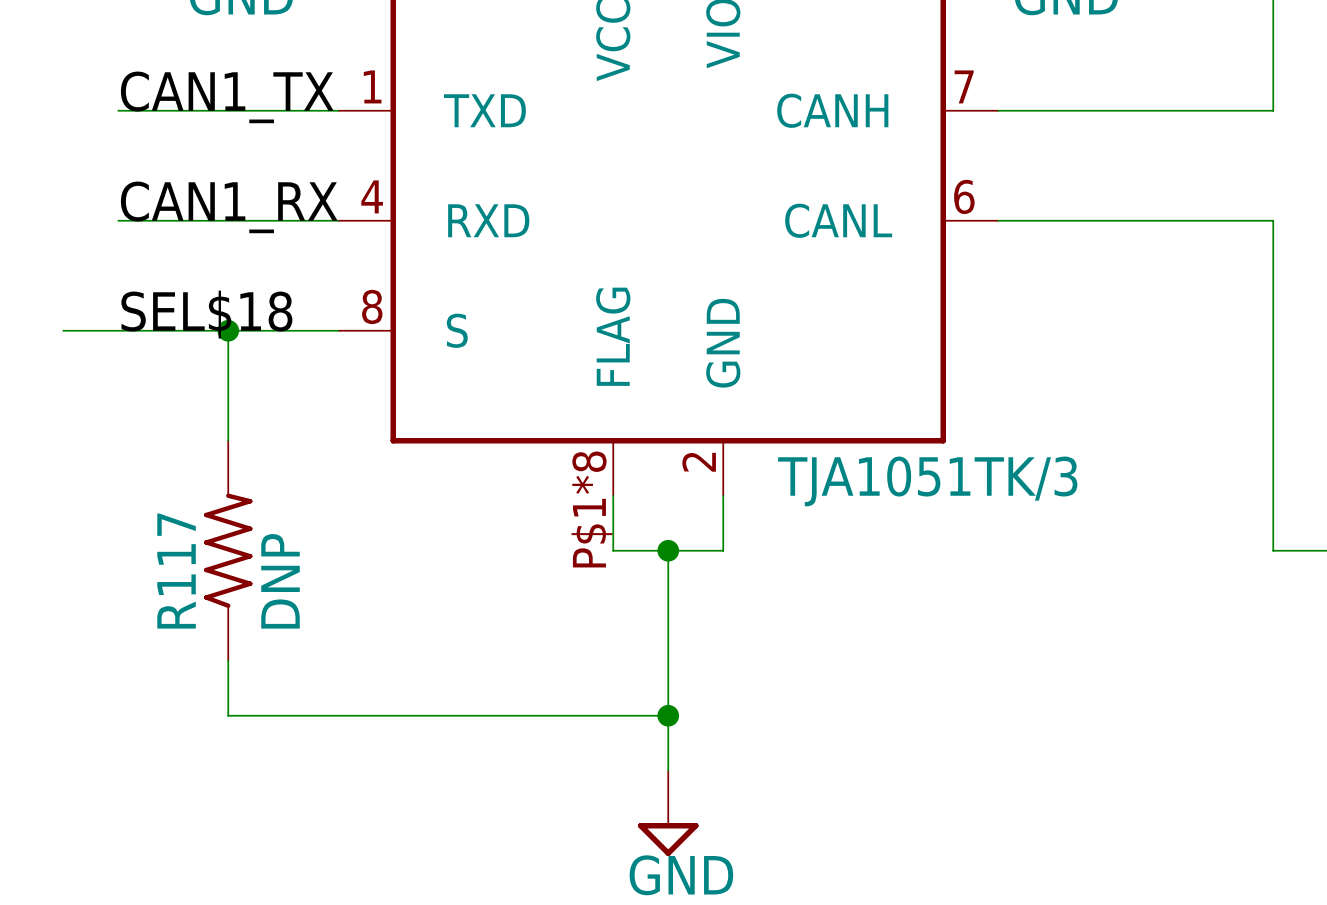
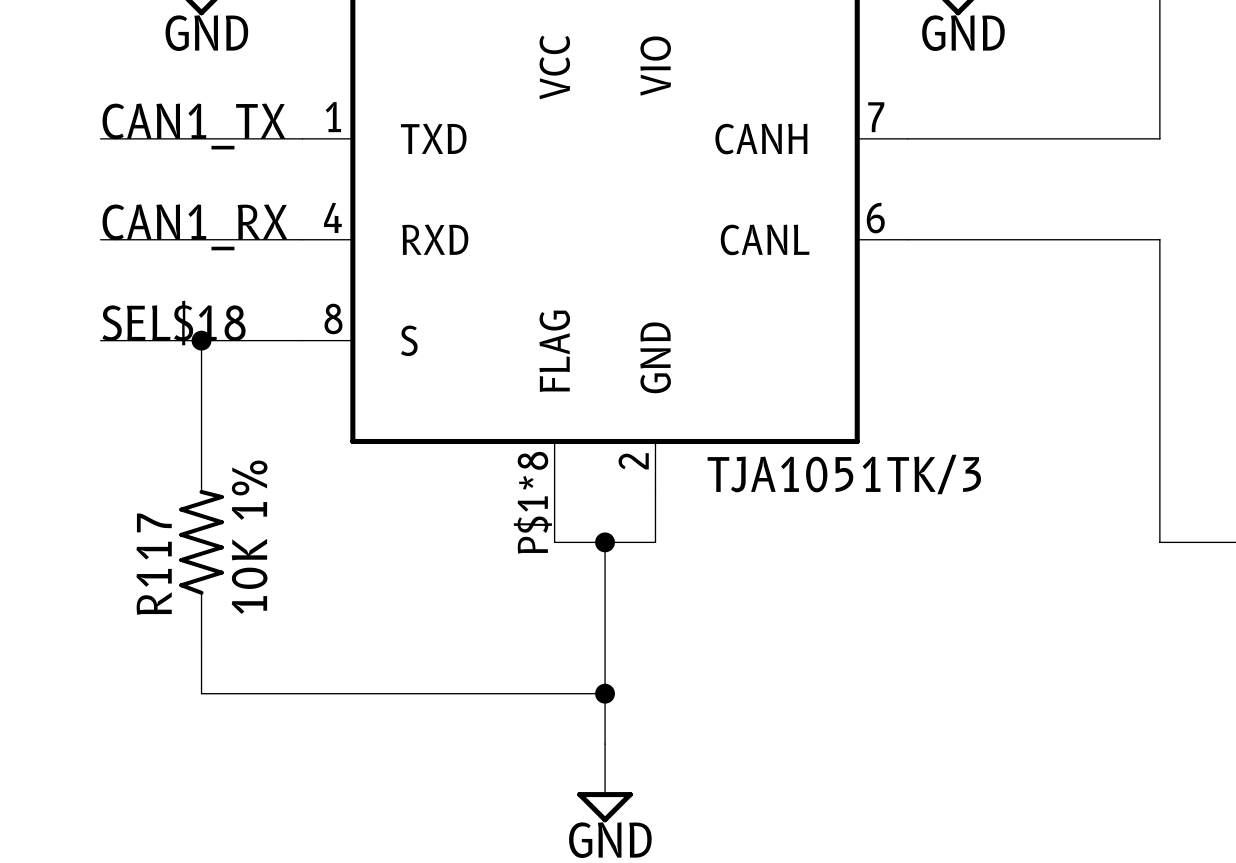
wire: (63, 330) (118, 330) -> none
R117 value: DNP (280, 581) -> 10K 1% (249, 537)

